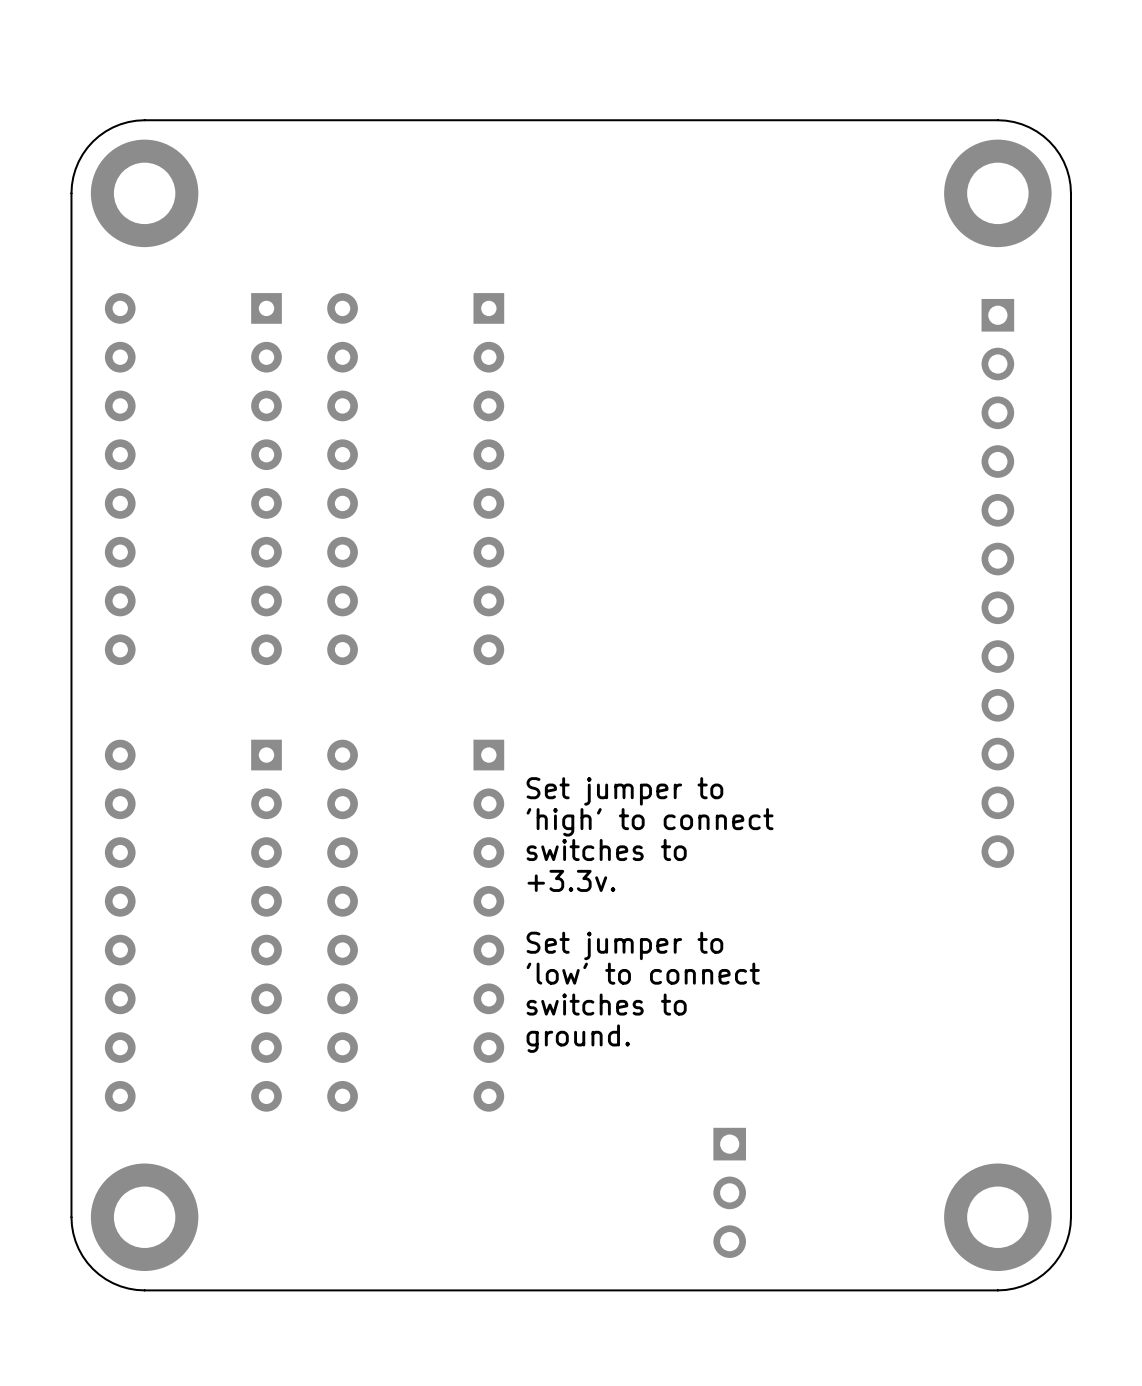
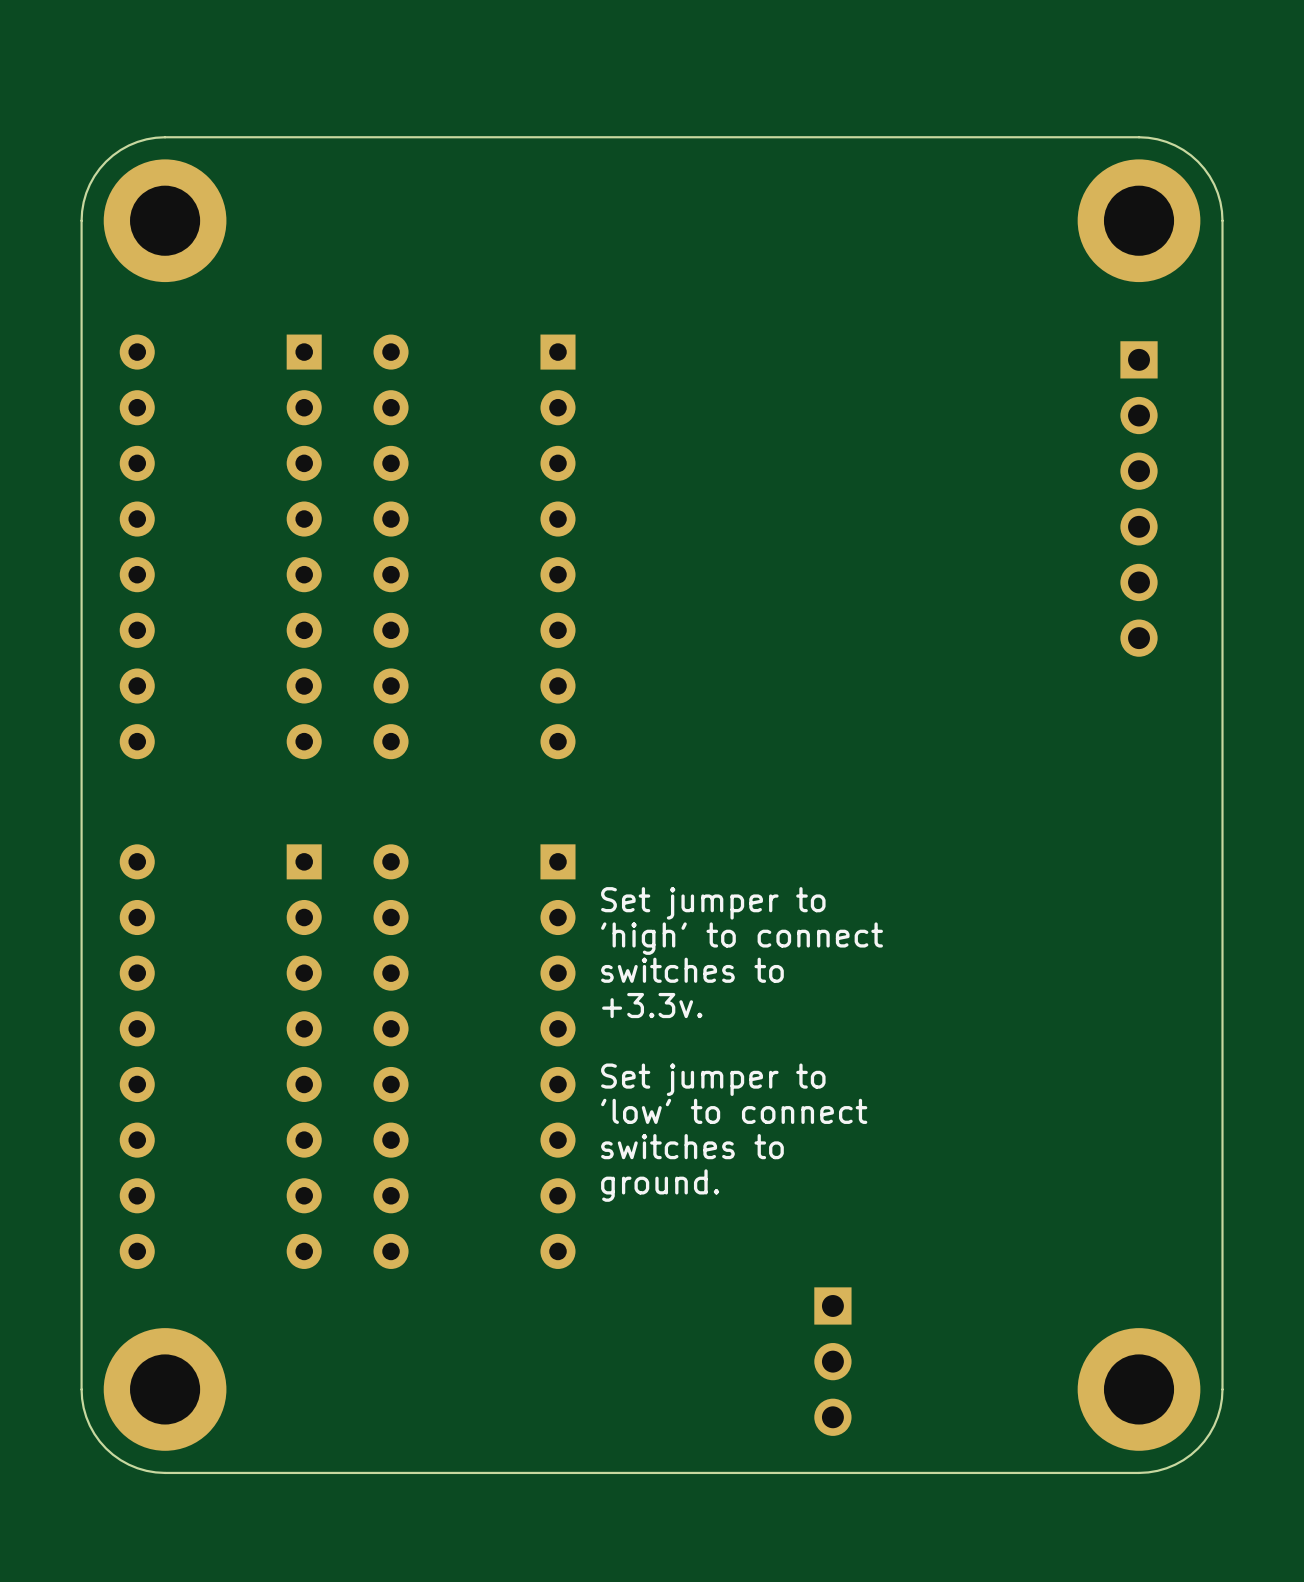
part: (997, 583) -> none

